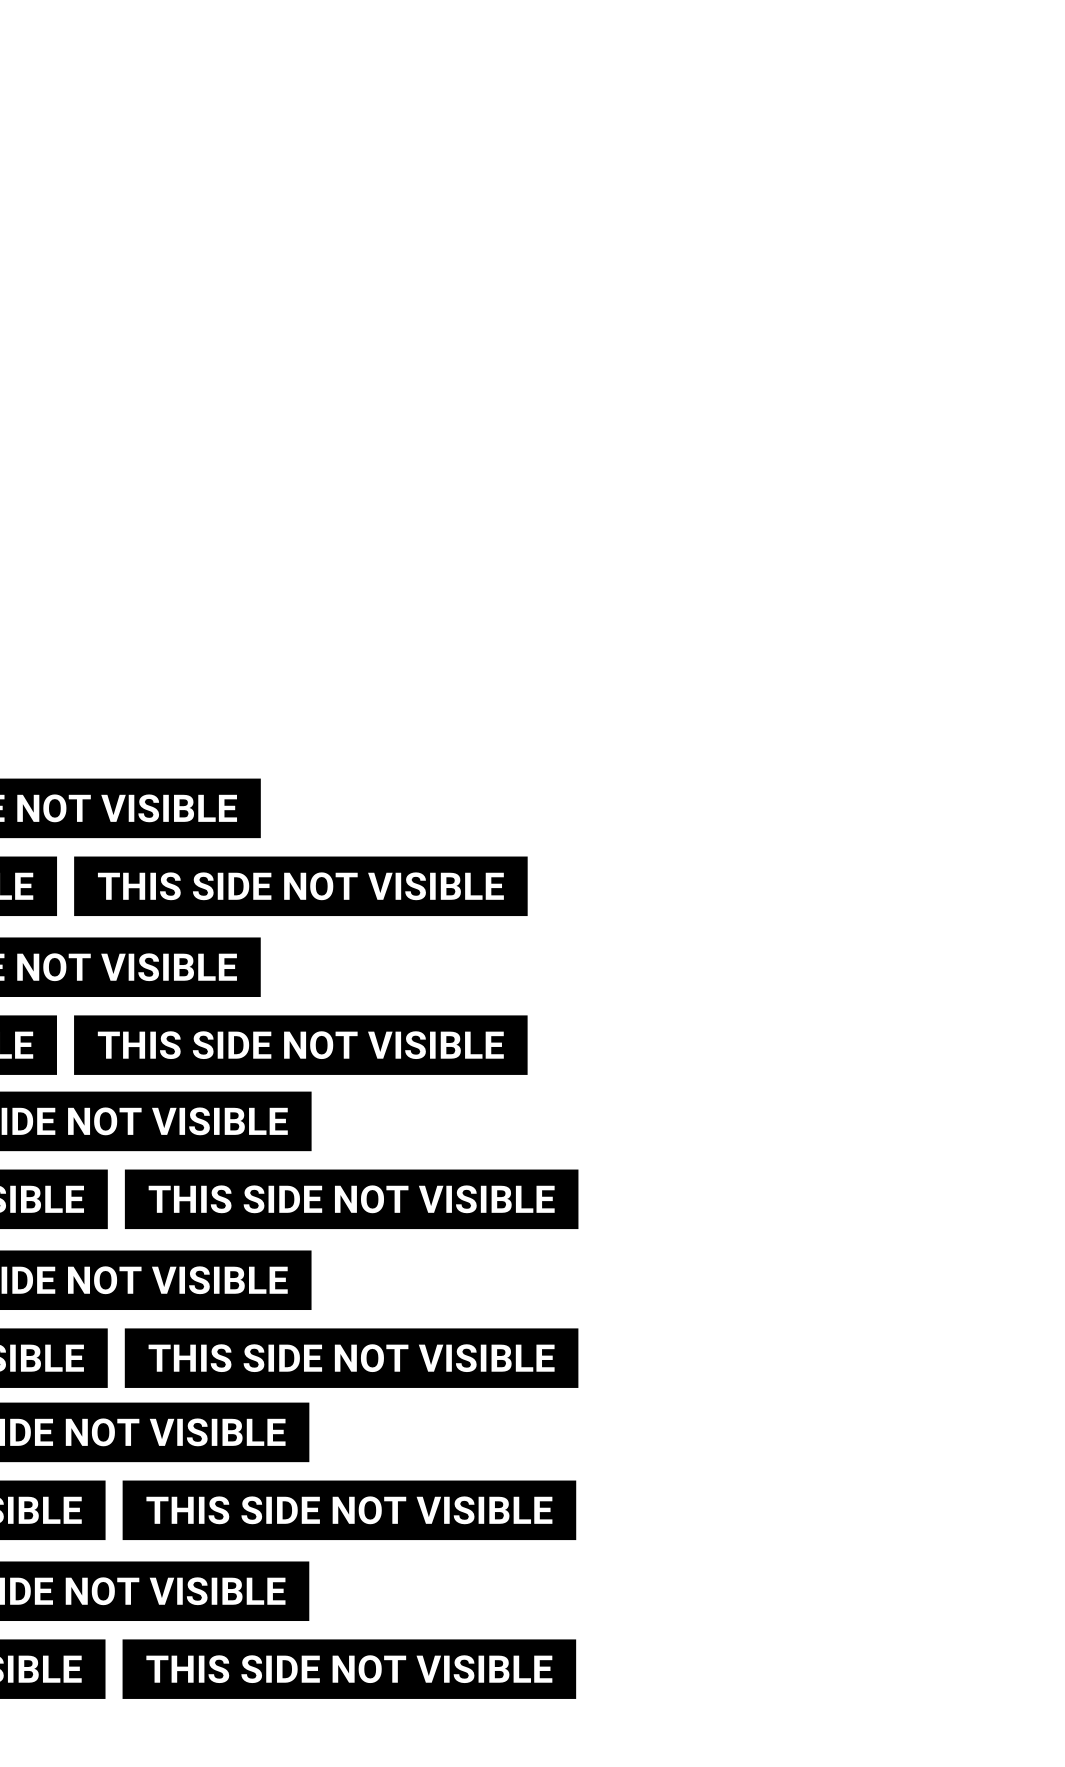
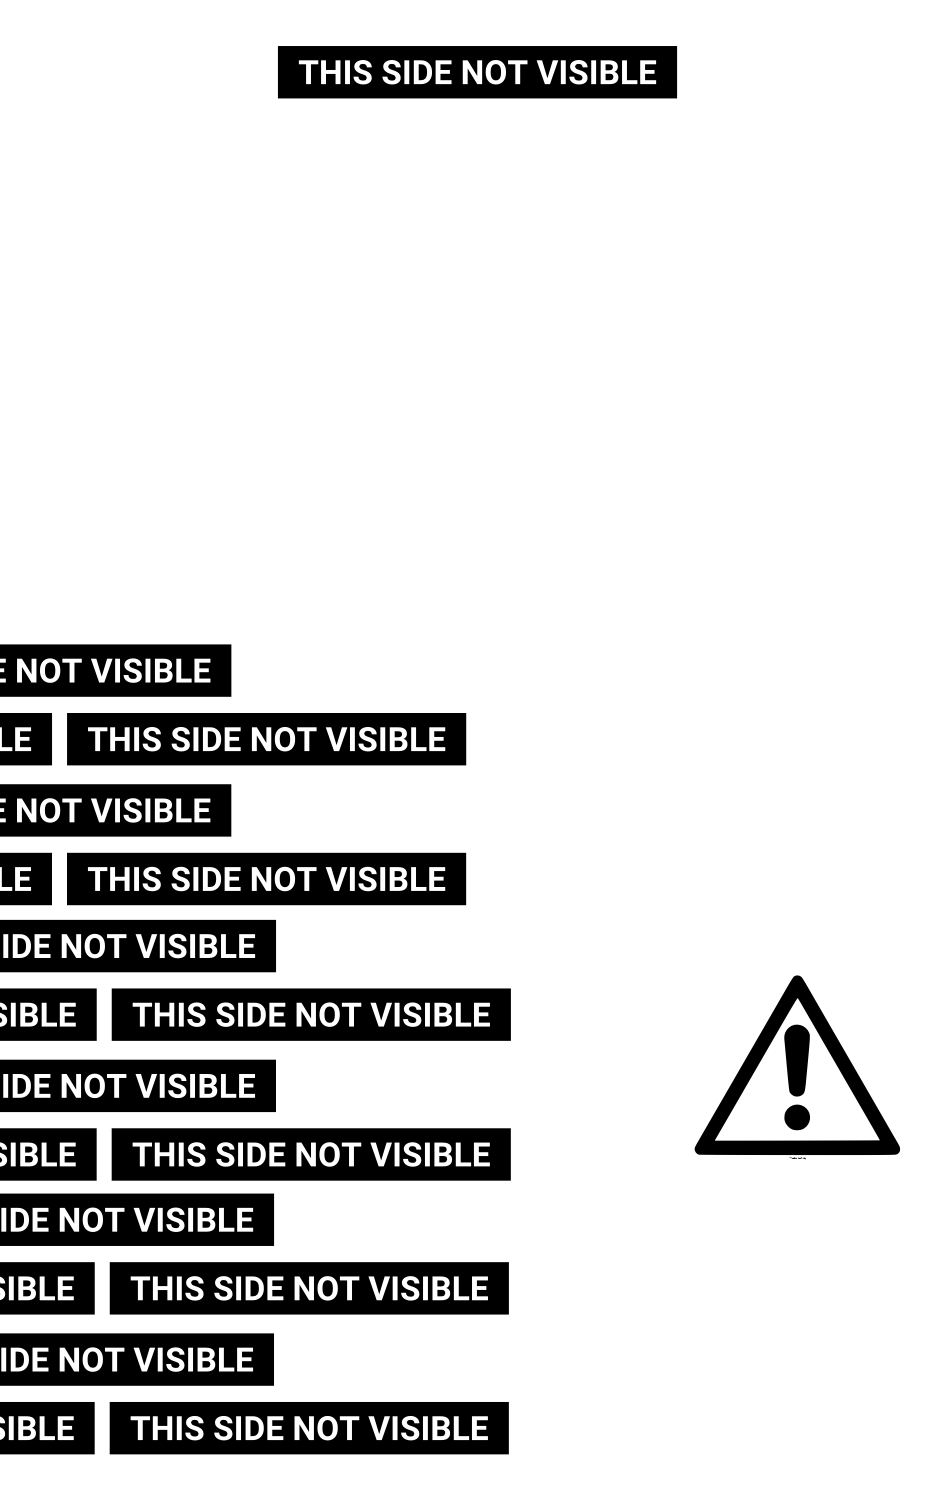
drawing: none -> [277, 46, 678, 99]
drawing: none -> [694, 975, 901, 1160]

